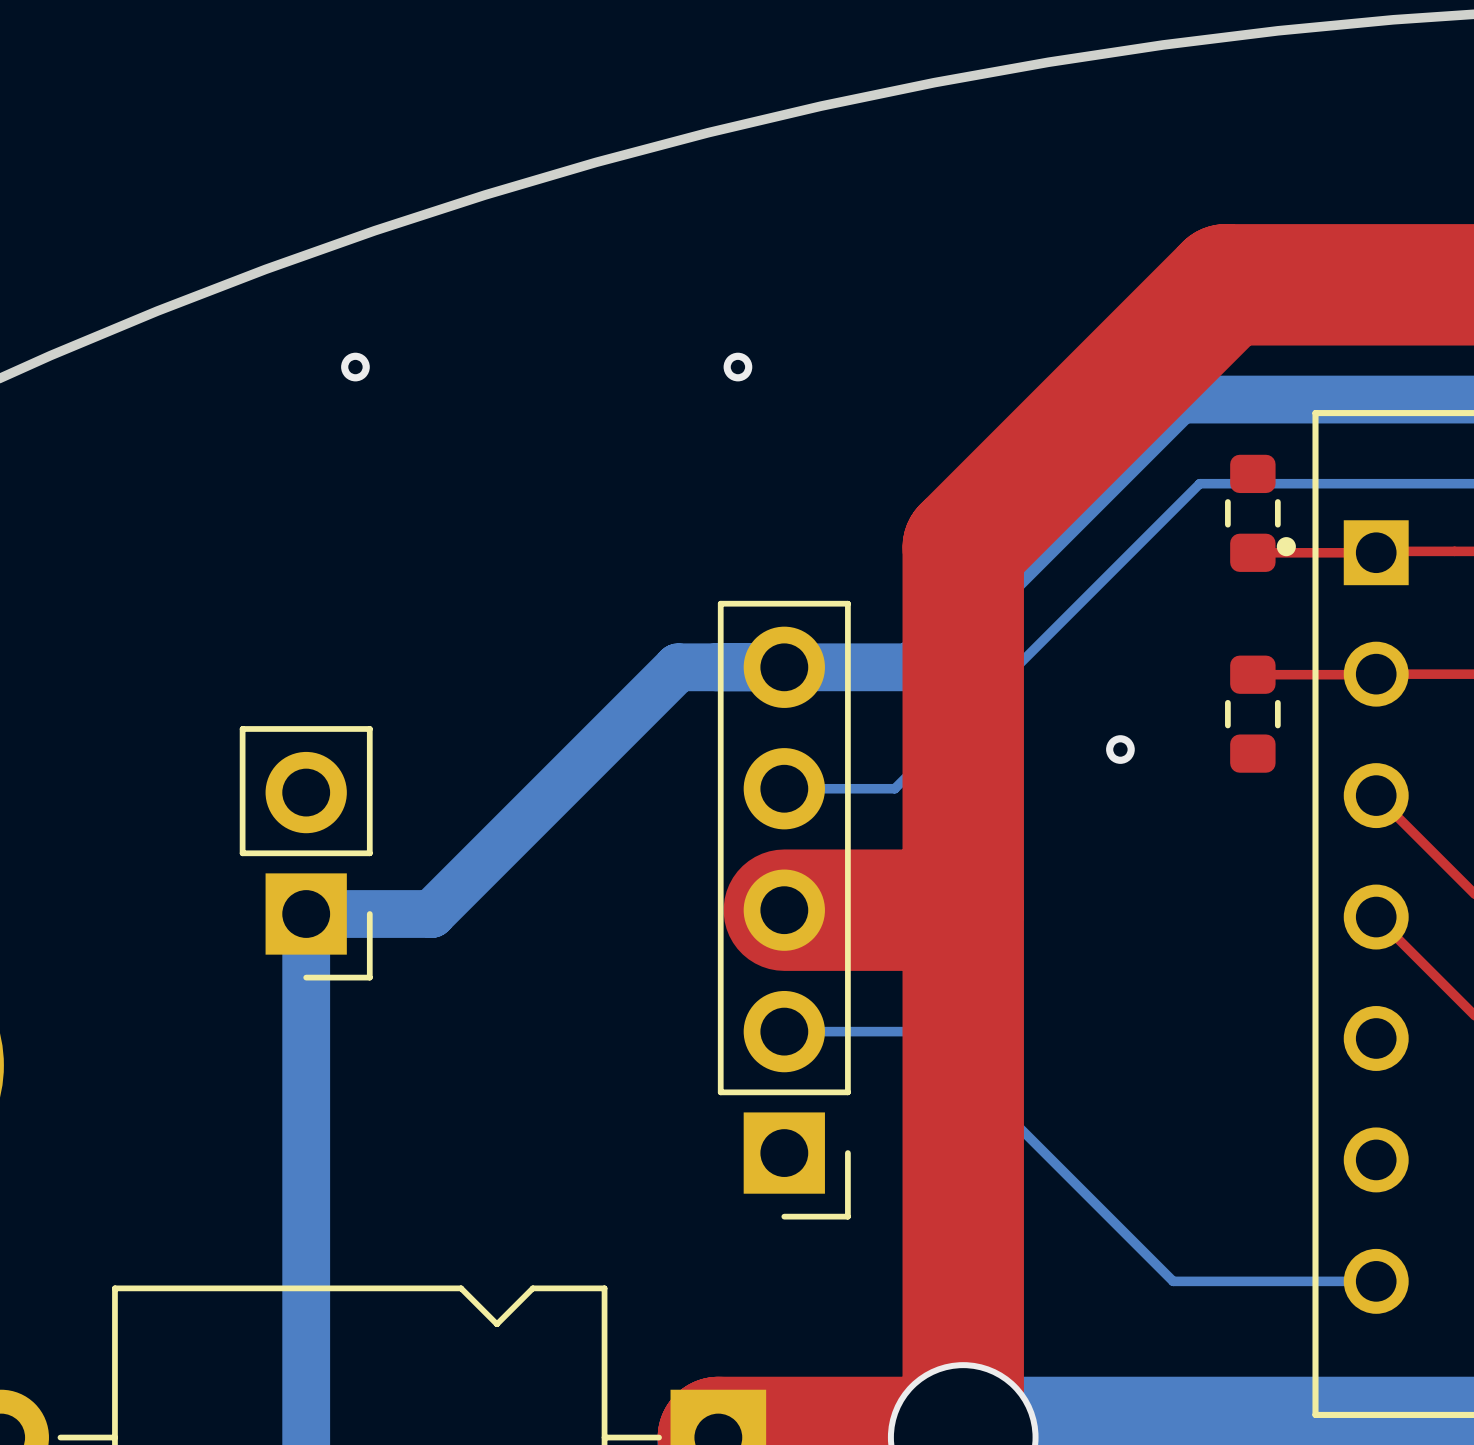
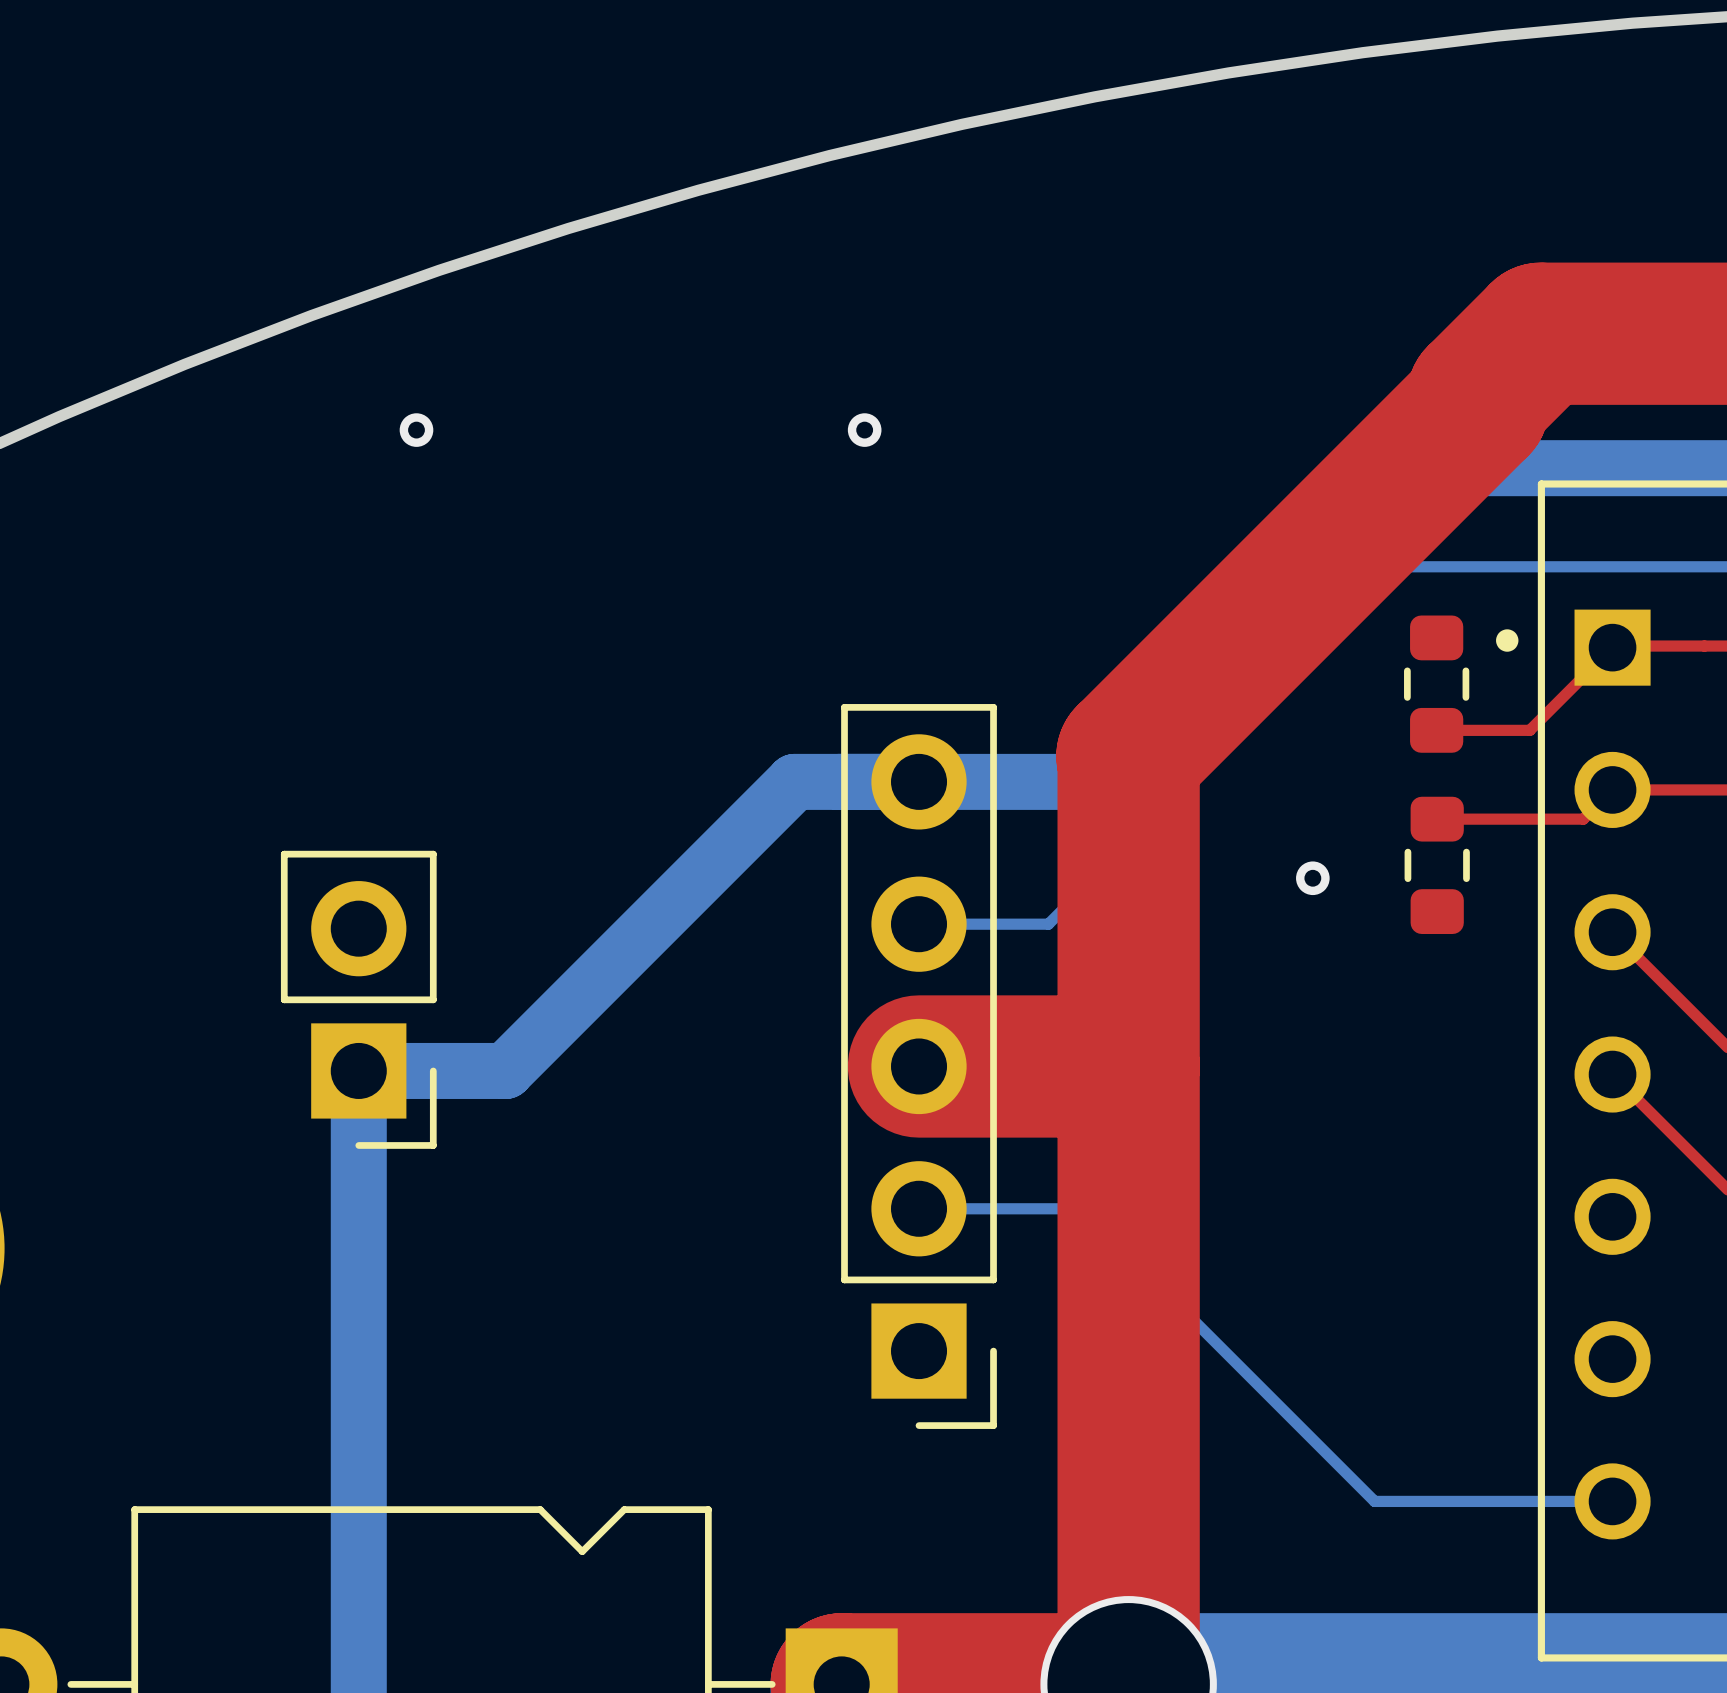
top track: (1315, 284) (1225, 284) (963, 547) (963, 646) -> (1540, 333) (1478, 396) (1478, 405) (1127, 756) (1128, 757)
part position: (1252, 513) -> (1436, 684)
top track: (1252, 552) (1376, 552) -> (1436, 730) (1529, 730) (1612, 647)
top track: (1252, 674) (1375, 674) -> (1437, 819) (1583, 819) (1611, 790)
part position: (1252, 714) -> (1437, 865)

